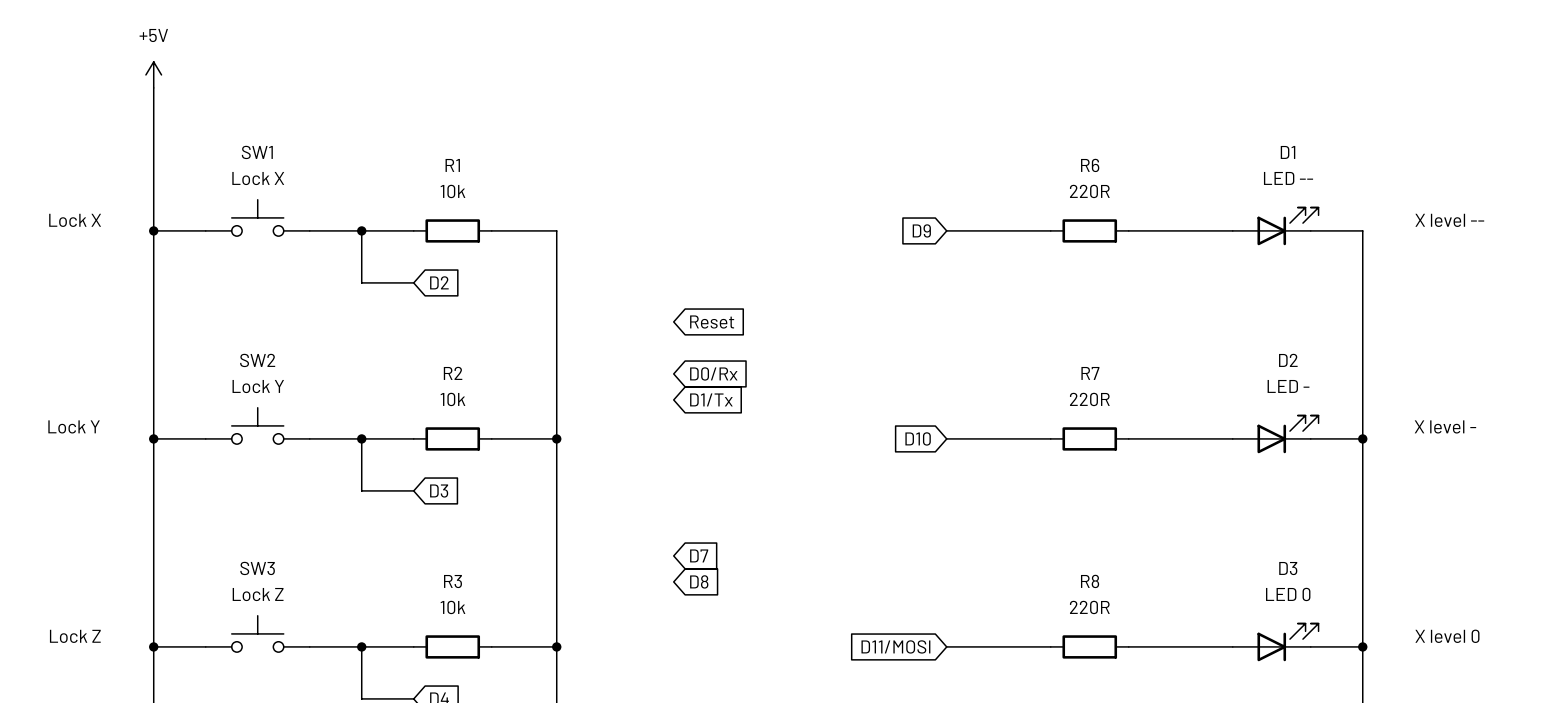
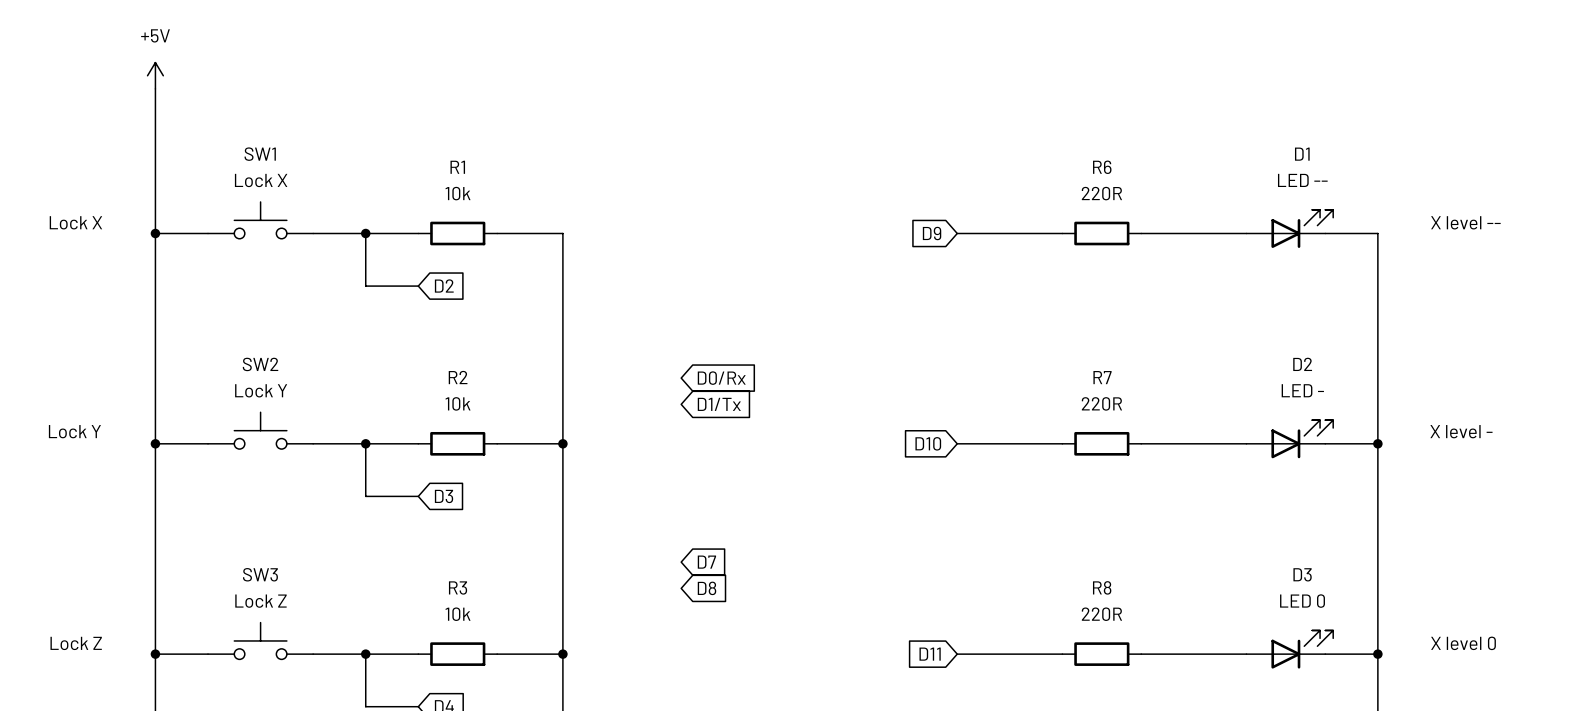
global label: Reset (712, 322) -> none
global label: D11/MOSI (895, 646) -> D11 (930, 654)

